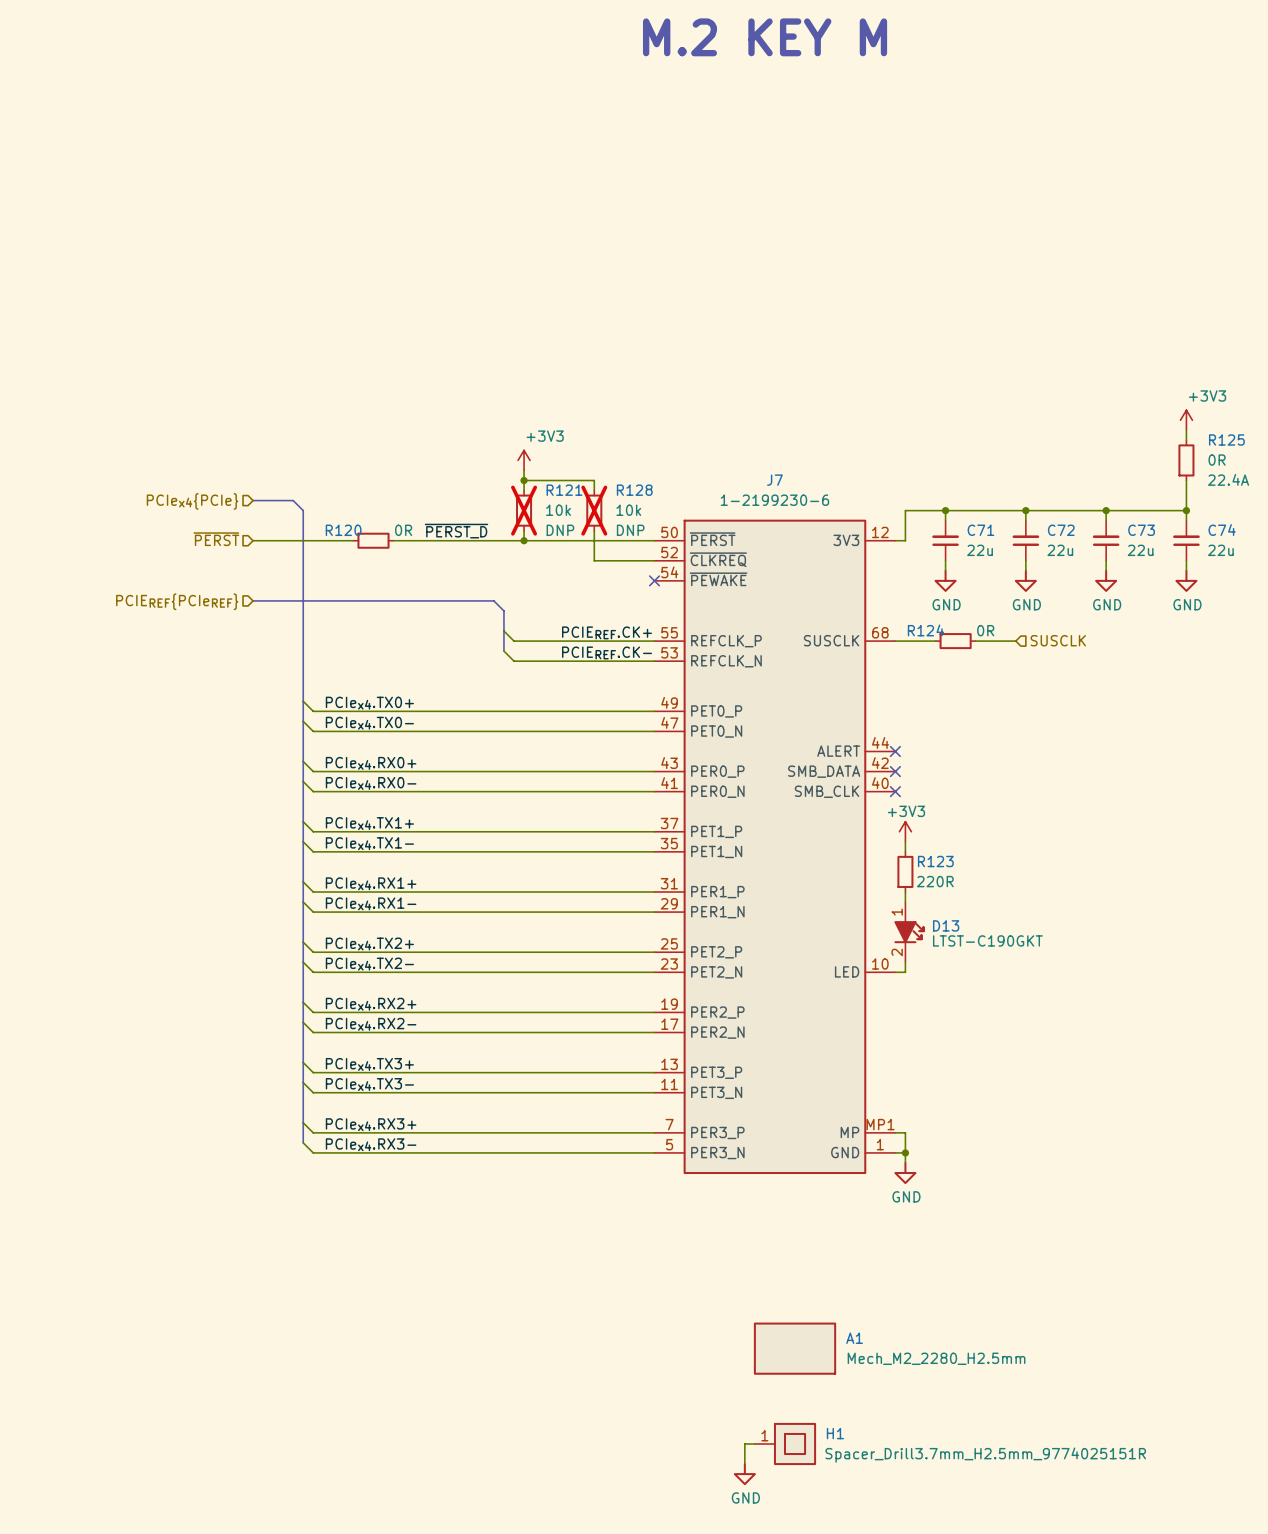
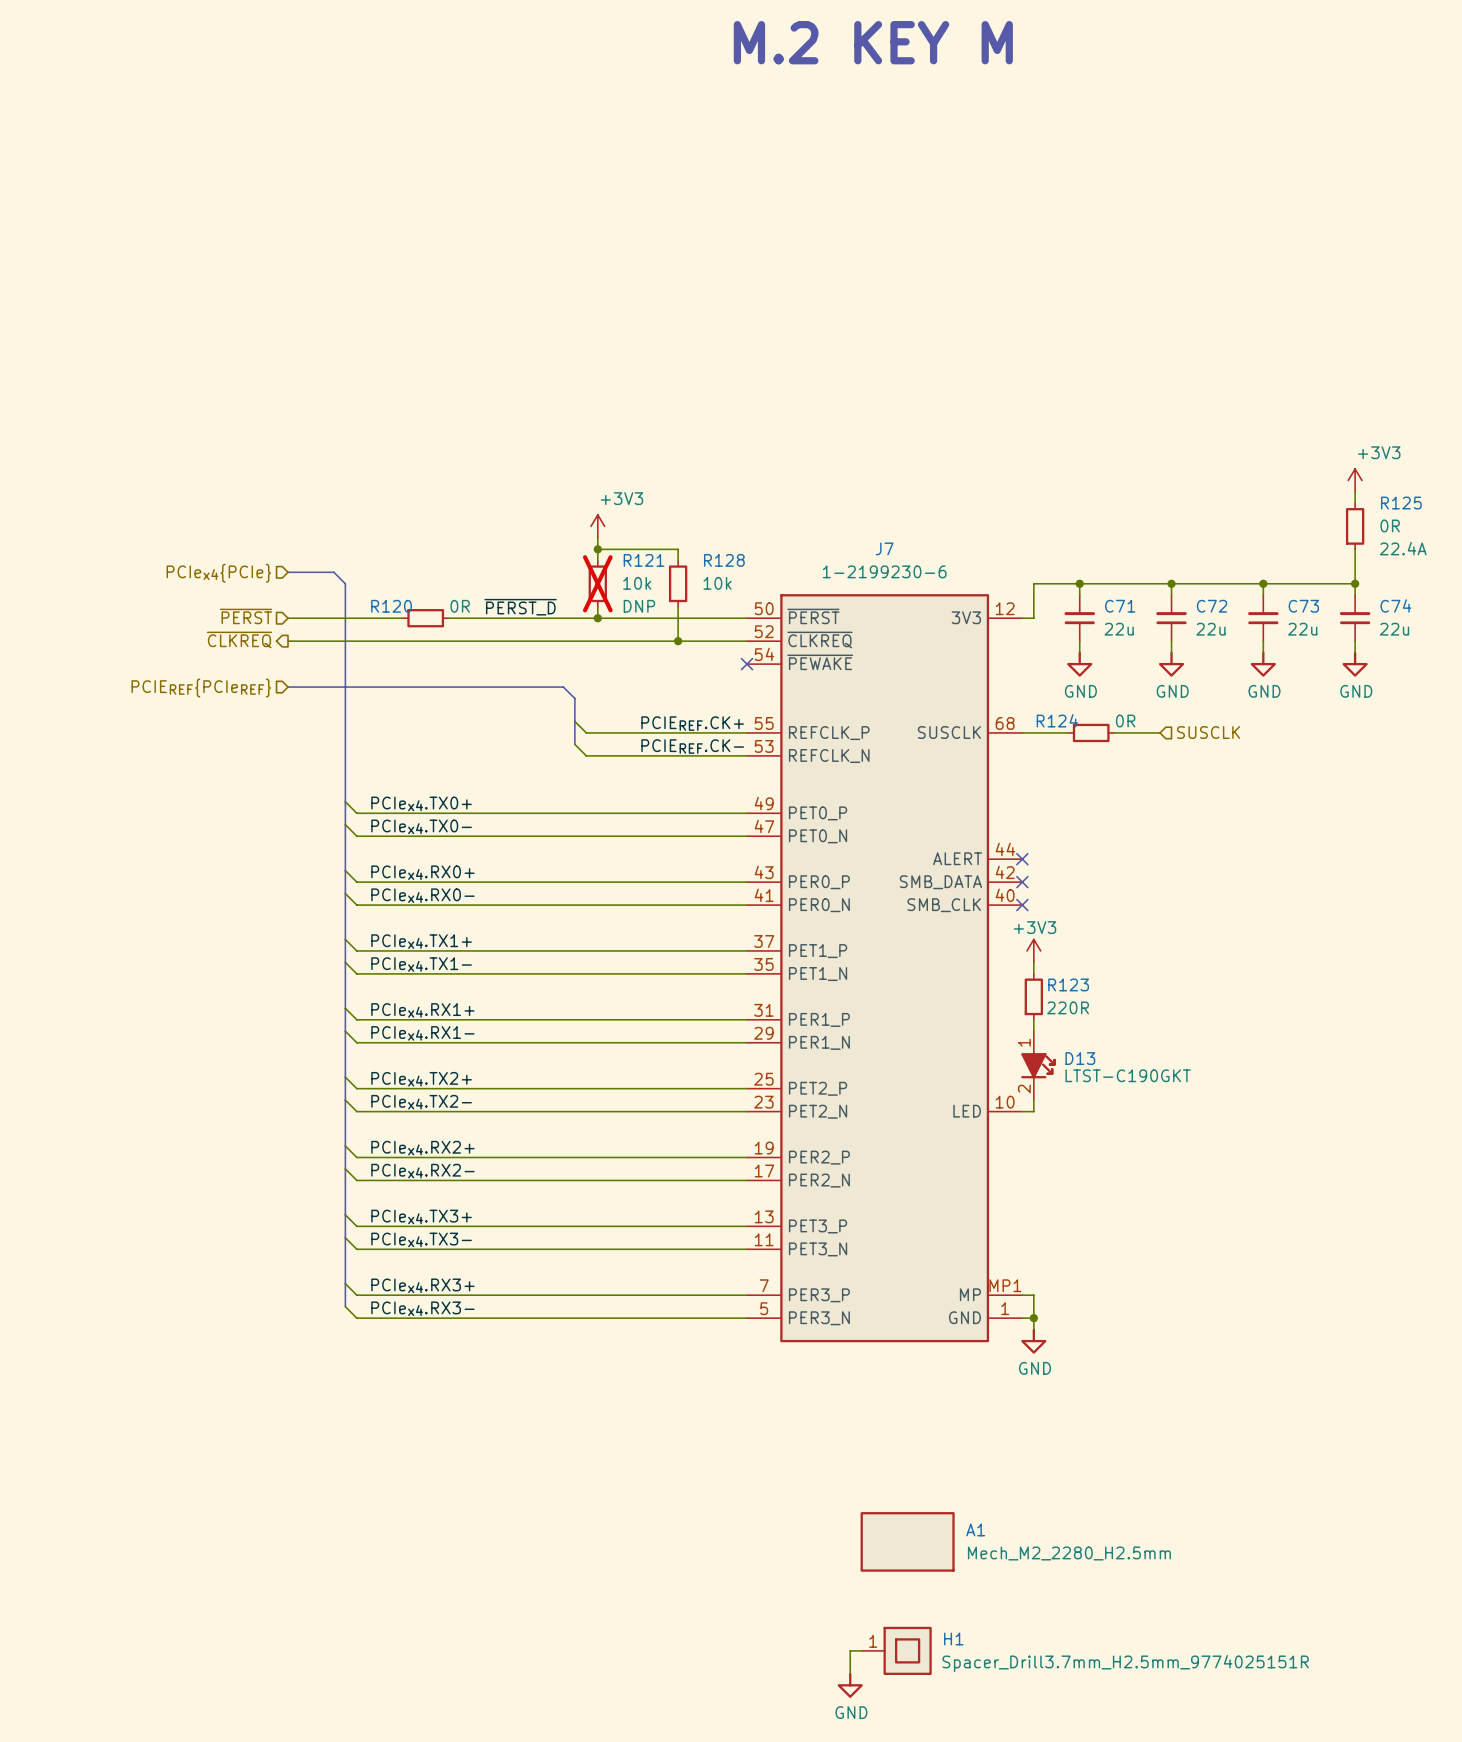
R128 do-not-place cross: (594, 510) -> none
R128 text: DNP (630, 530) -> none
hierarchical label: none -> ~{CLKREQ} (239, 639)
wire: none -> (288, 641) (678, 641)
junction: none -> (678, 641)

